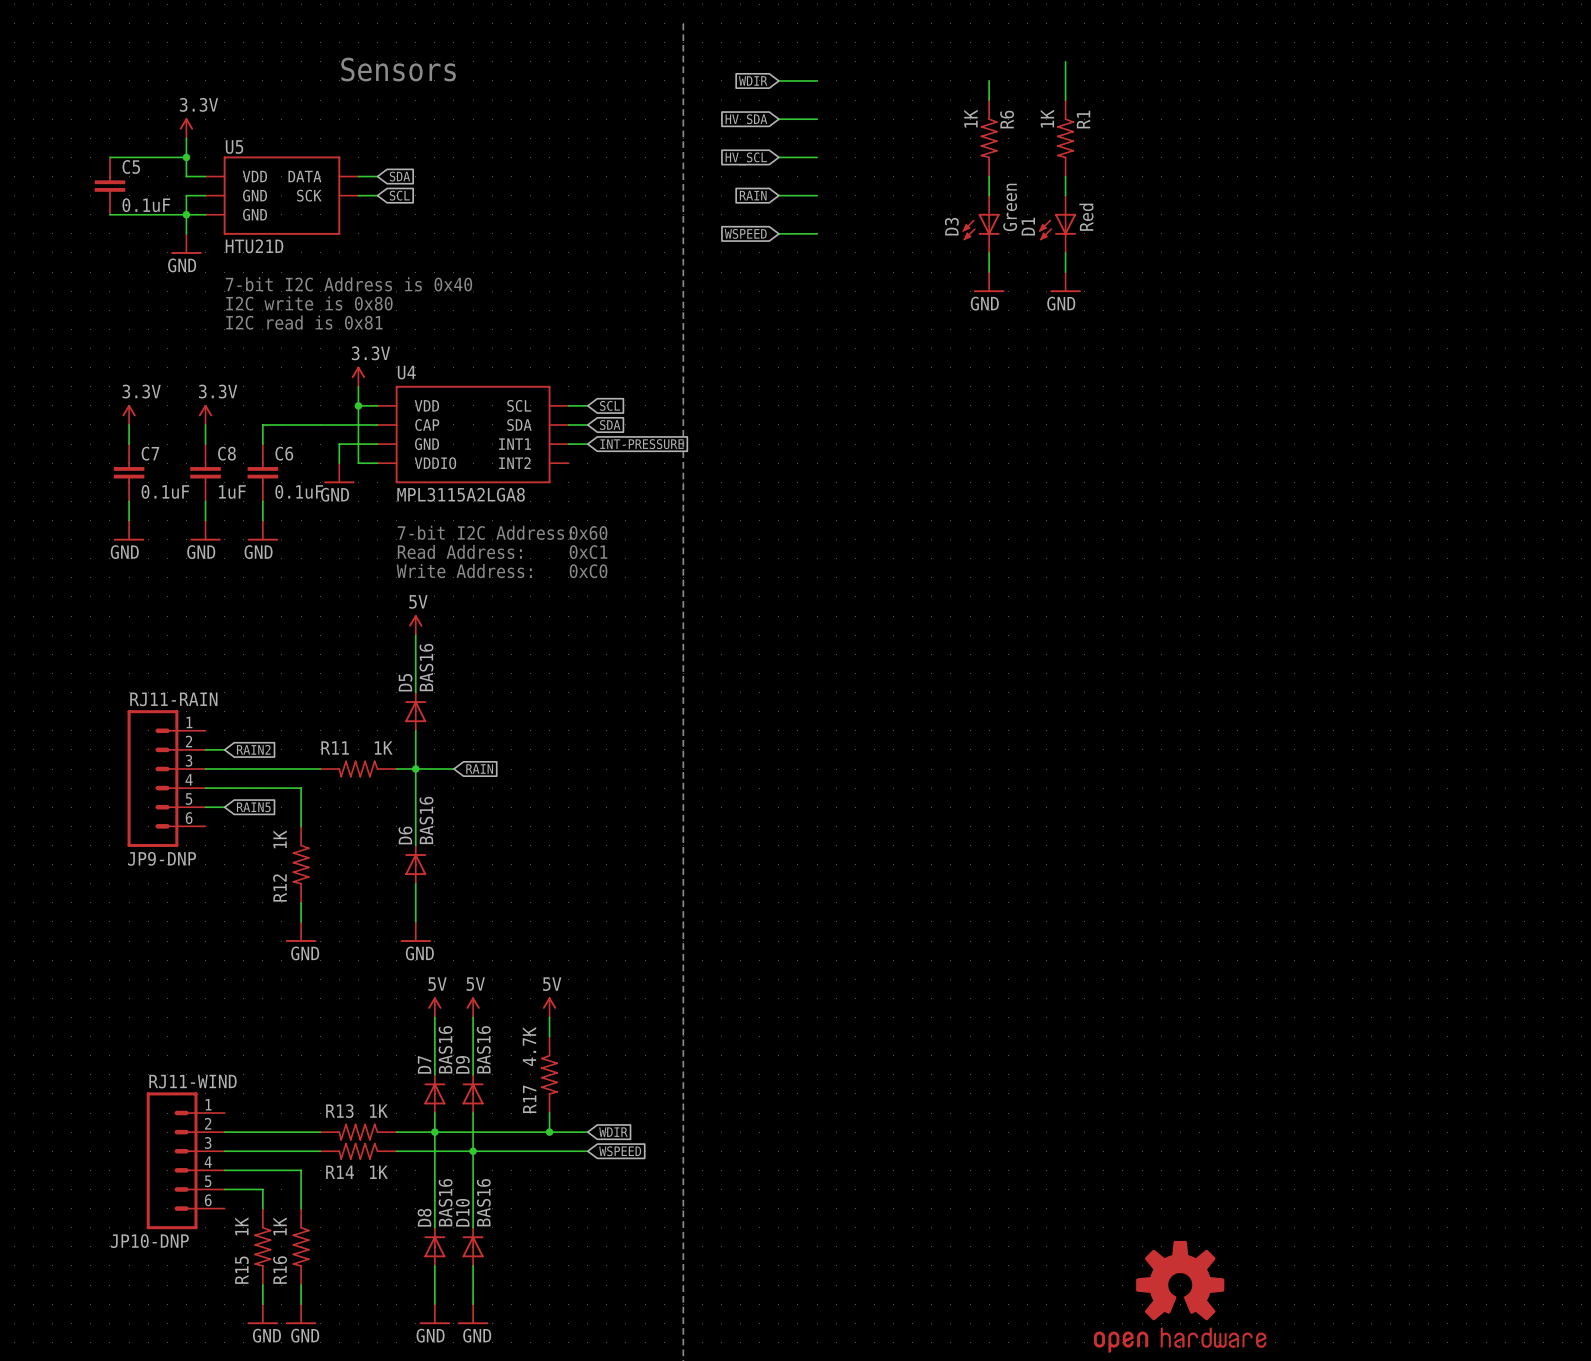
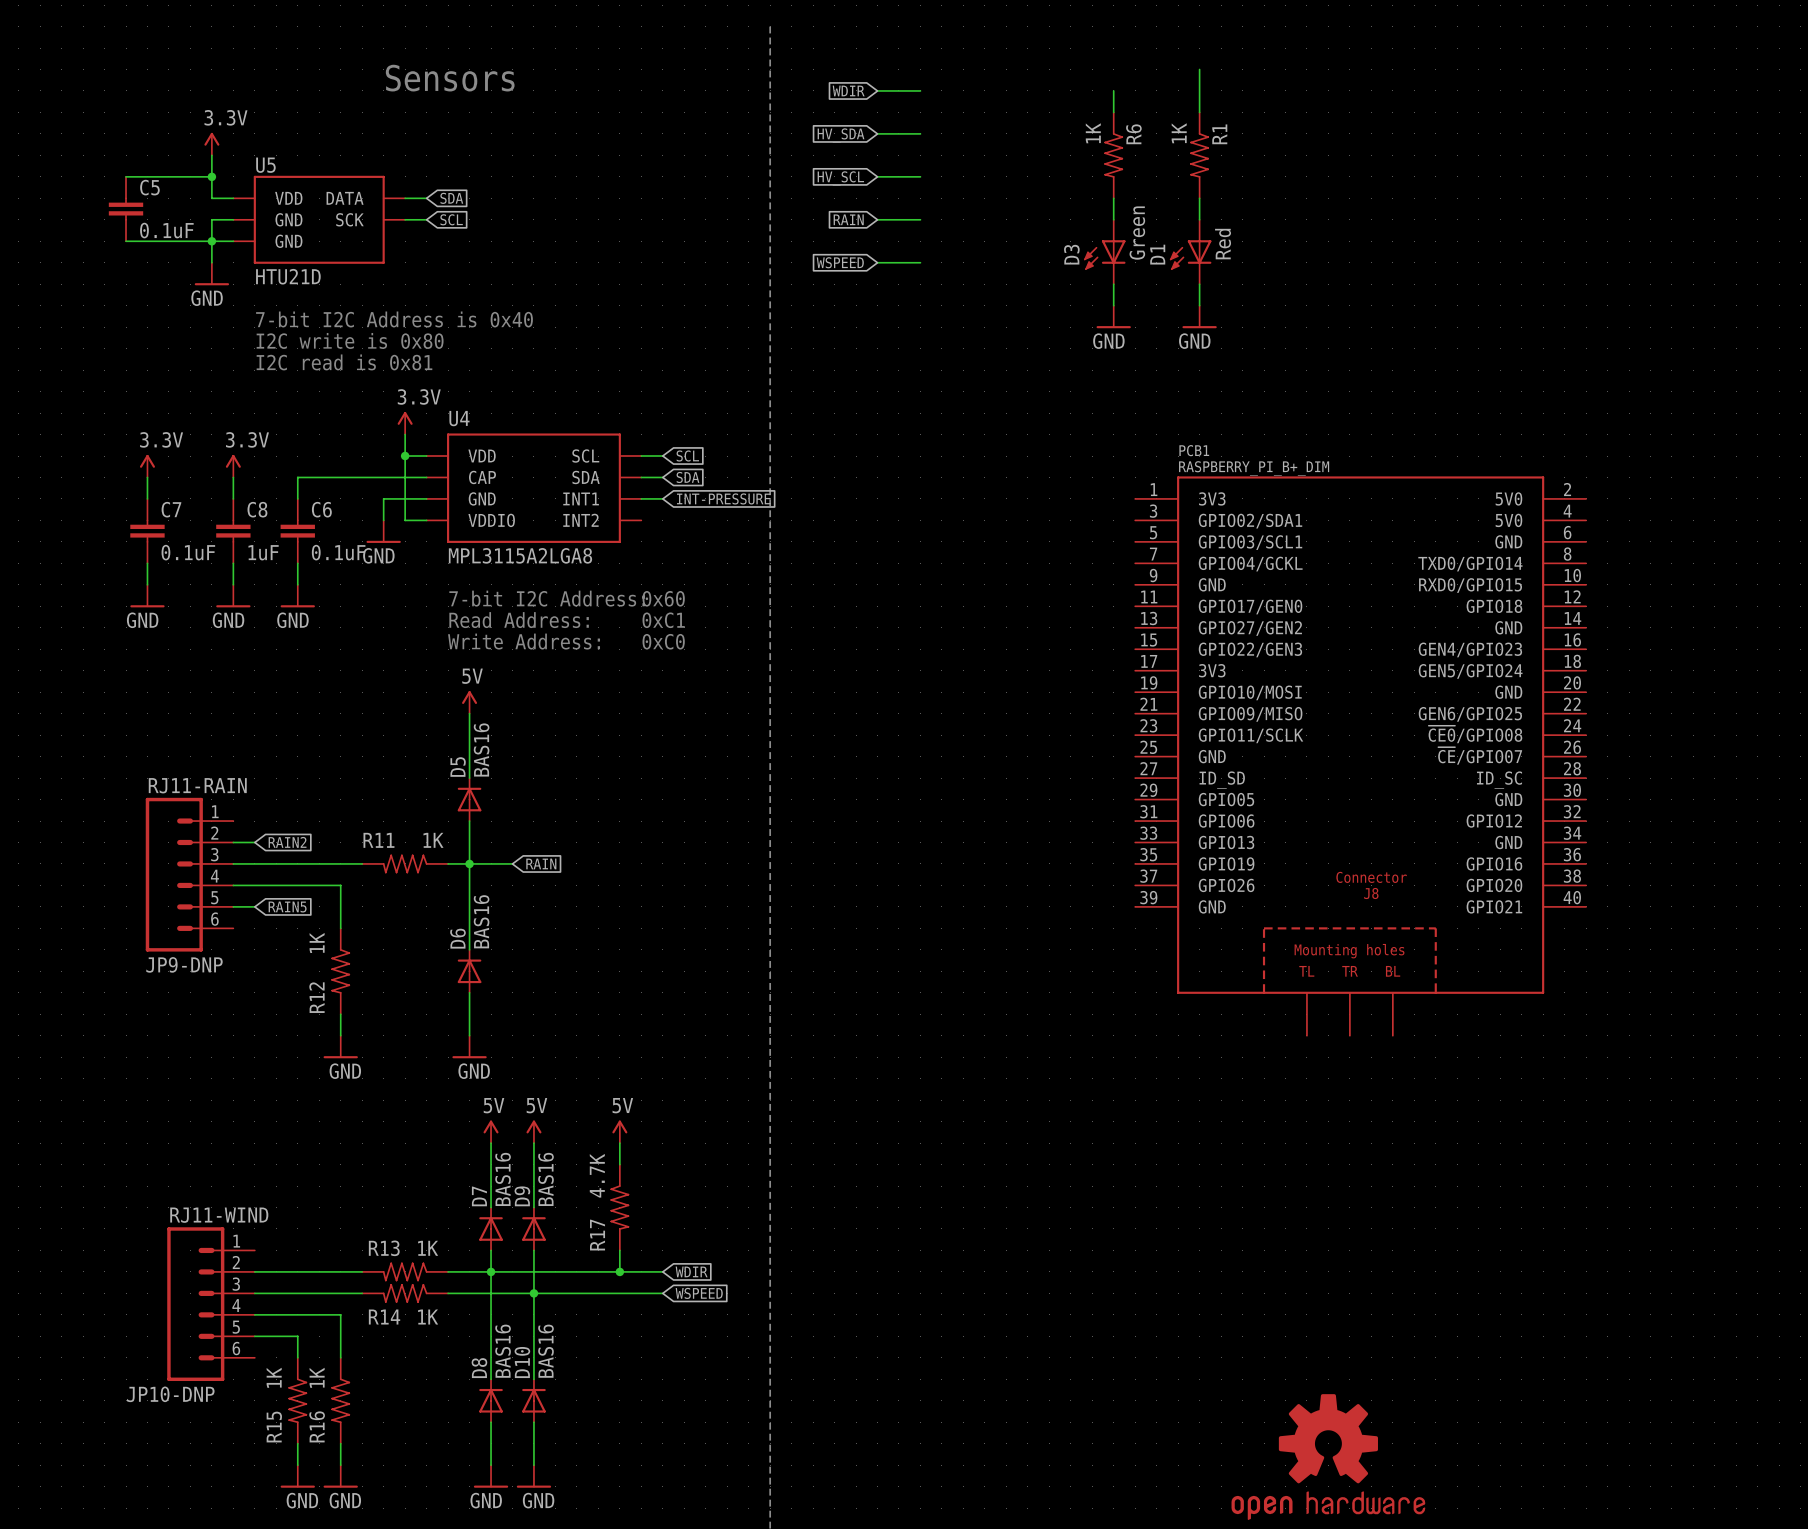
PCB1: none -> RASPBERRY_PI_B+_DIM (1360, 756)

